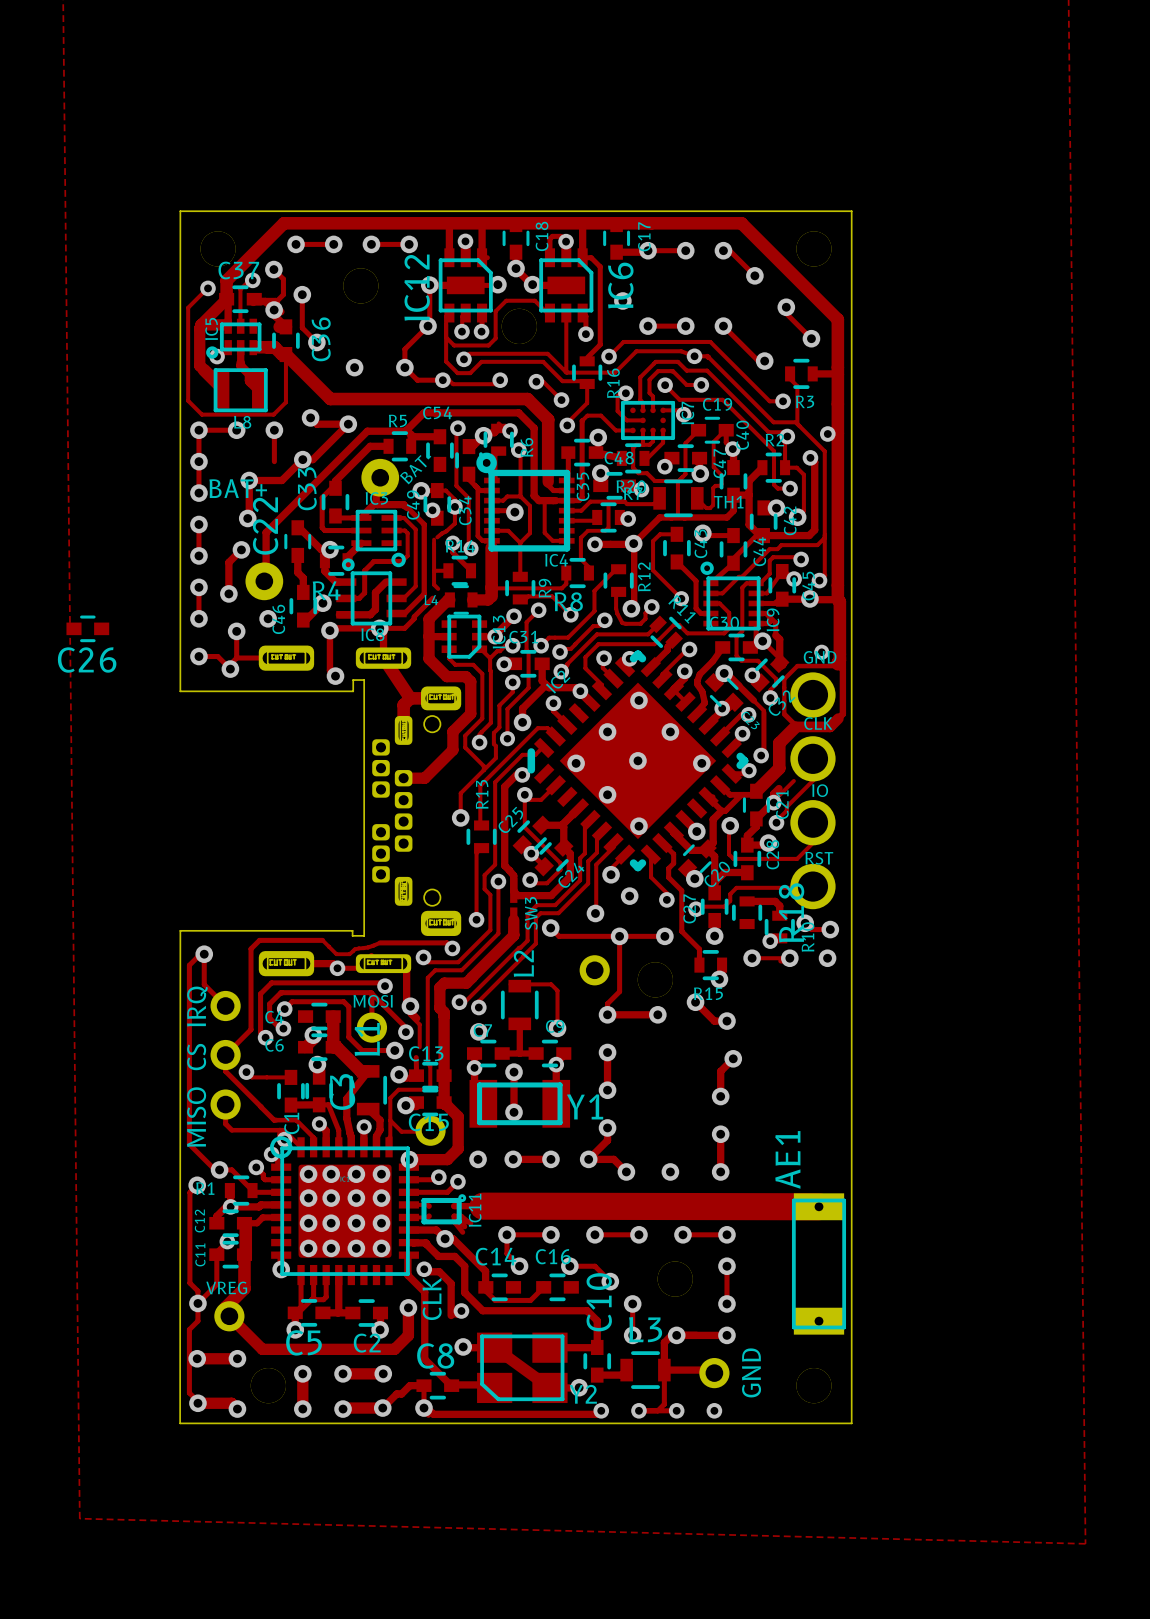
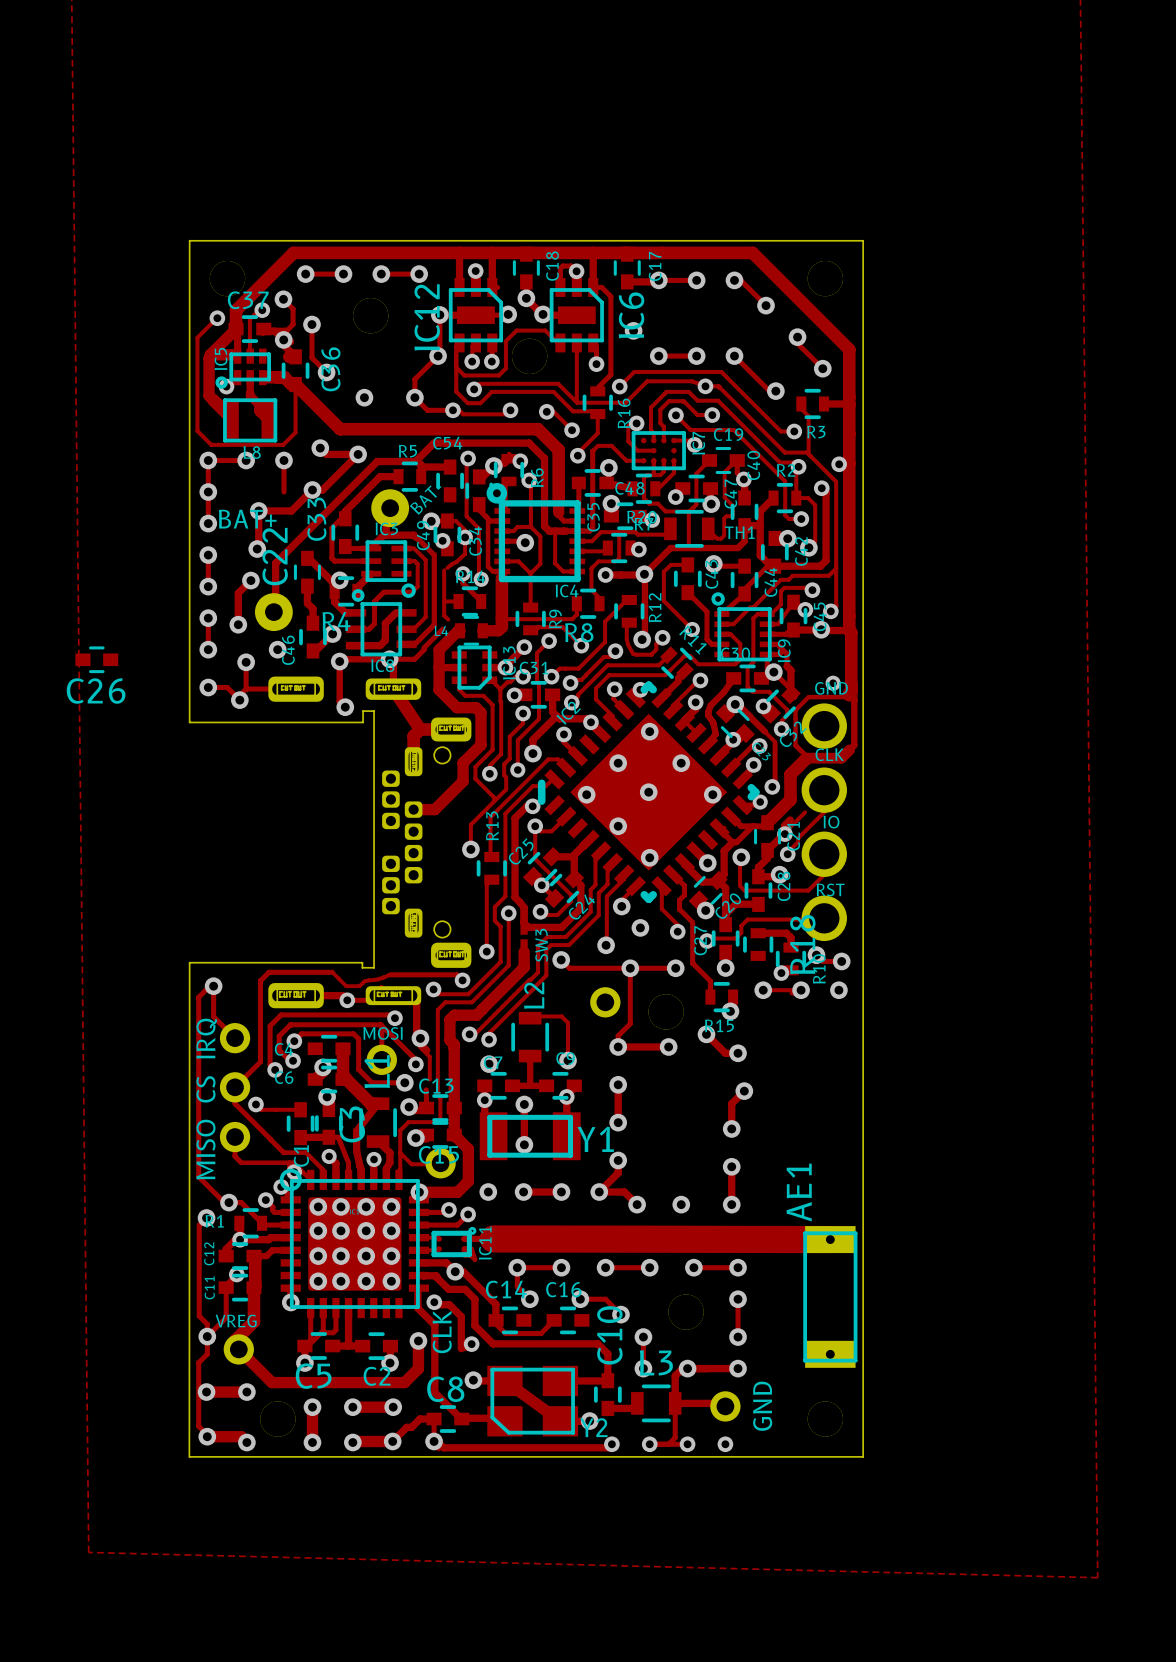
track: (461, 1216) (470, 1223) -> none
track: (454, 1221) (462, 1232) -> none

